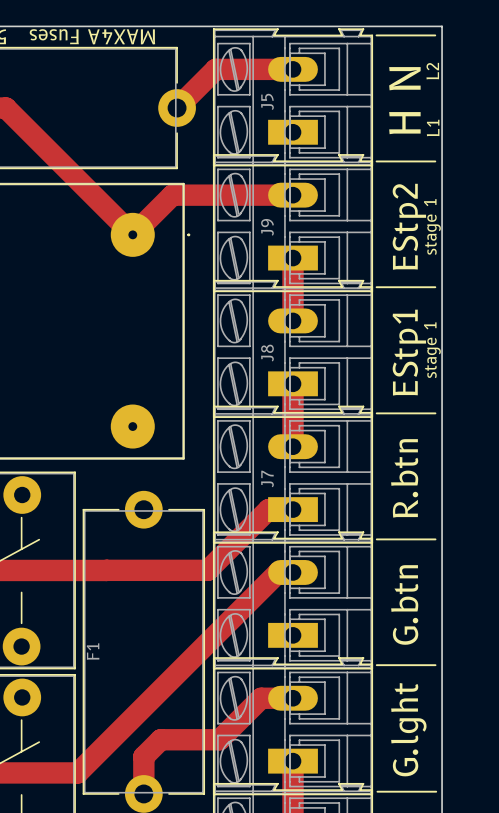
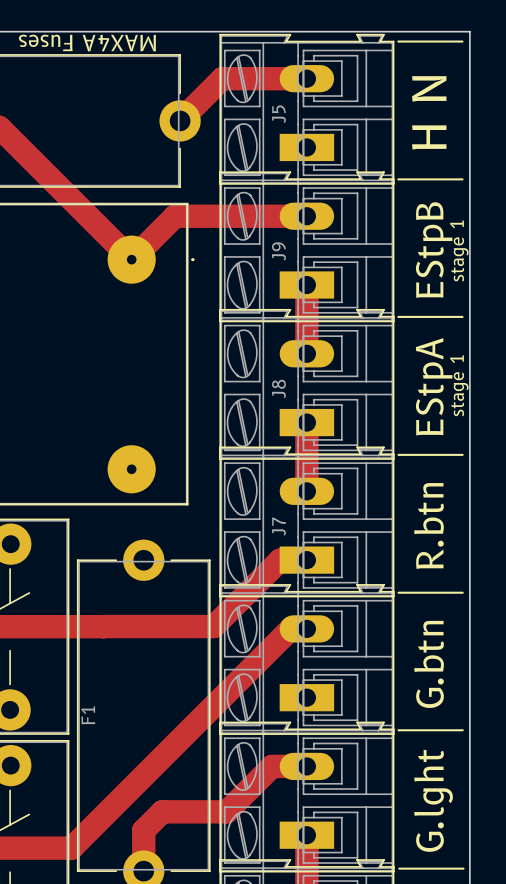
text: L2 (432, 71) -> none
text: L1 (433, 127) -> none
text: EStp2 (409, 226) -> EStpB (434, 250)
text: EStp1 (409, 352) -> EStpA (434, 386)

